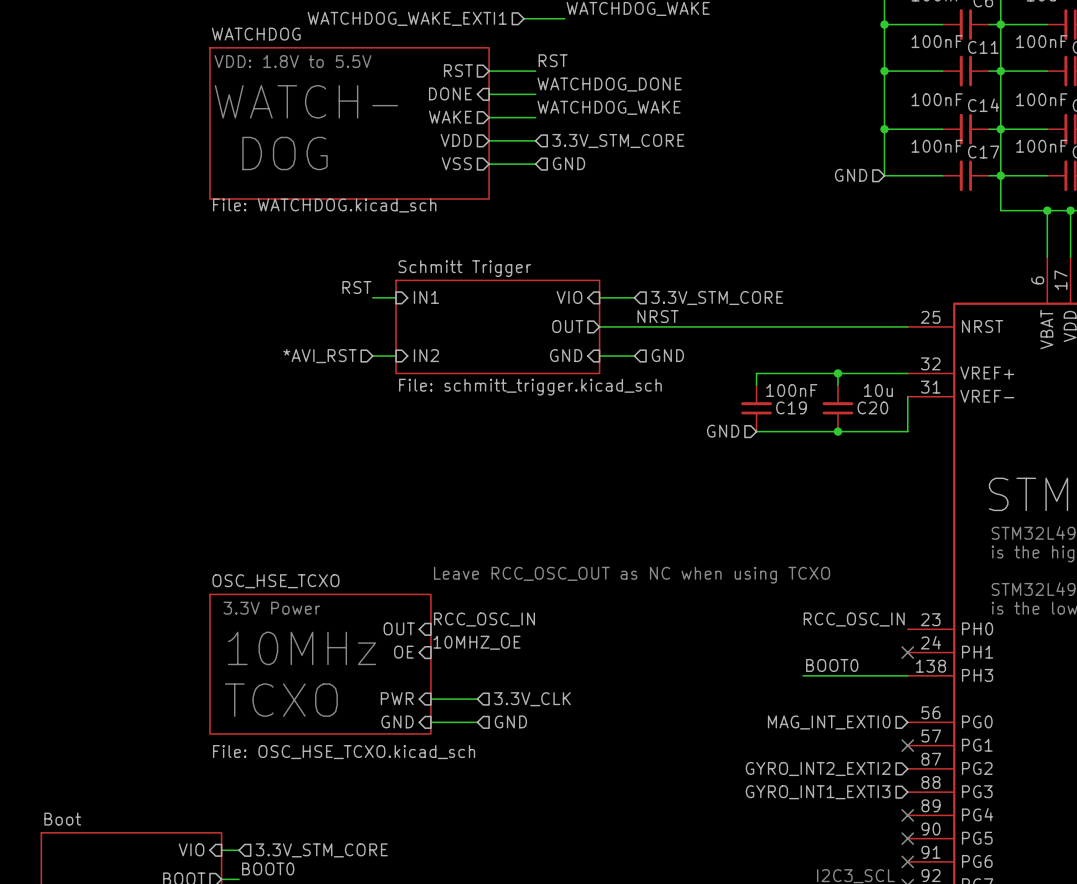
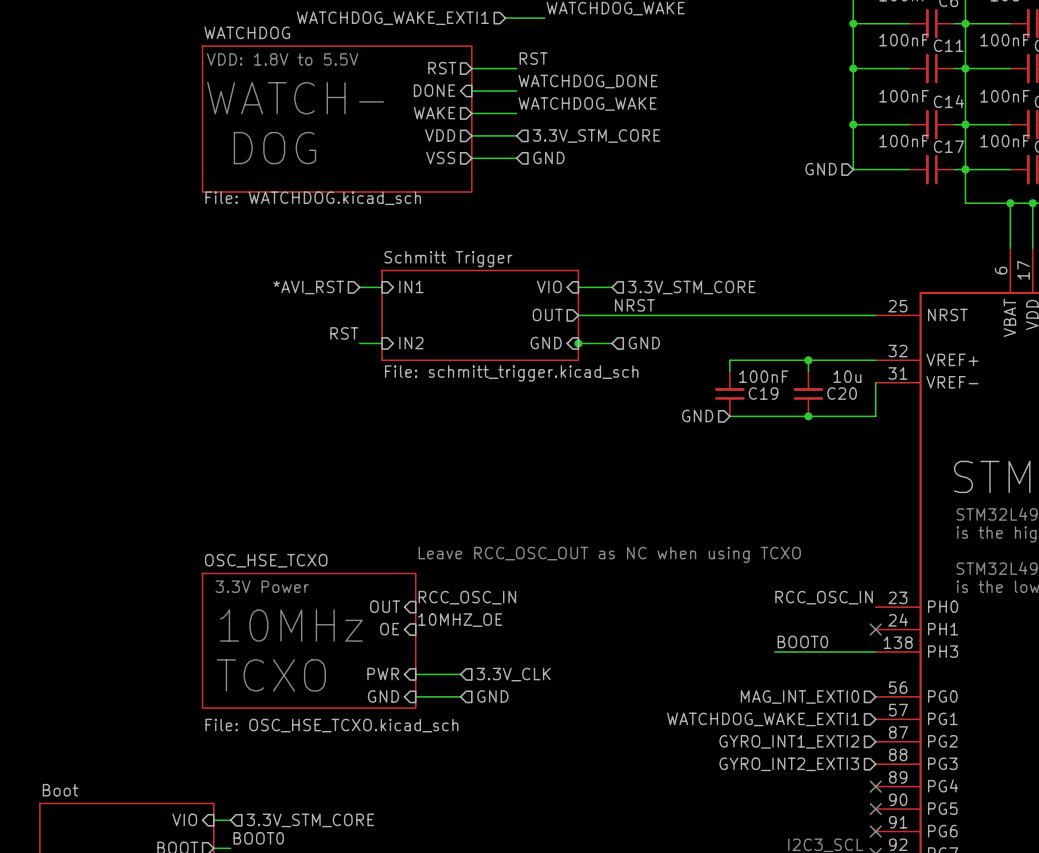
label position: RST (356, 287) -> RST (344, 333)
hierarchical label position: *AVI_RST (319, 356) -> *AVI_RST (308, 287)
junction: none -> (578, 343)
hierarchical label: none -> WATCHDOG_WAKE_EXTI1 (763, 719)
no-connect mark: (907, 745) -> none
hierarchical label: GYRO_INT2_EXTI2 (818, 769) -> GYRO_INT1_EXTI2 (789, 741)
hierarchical label: GYRO_INT1_EXTI3 (818, 792) -> GYRO_INT2_EXTI3 (789, 764)

